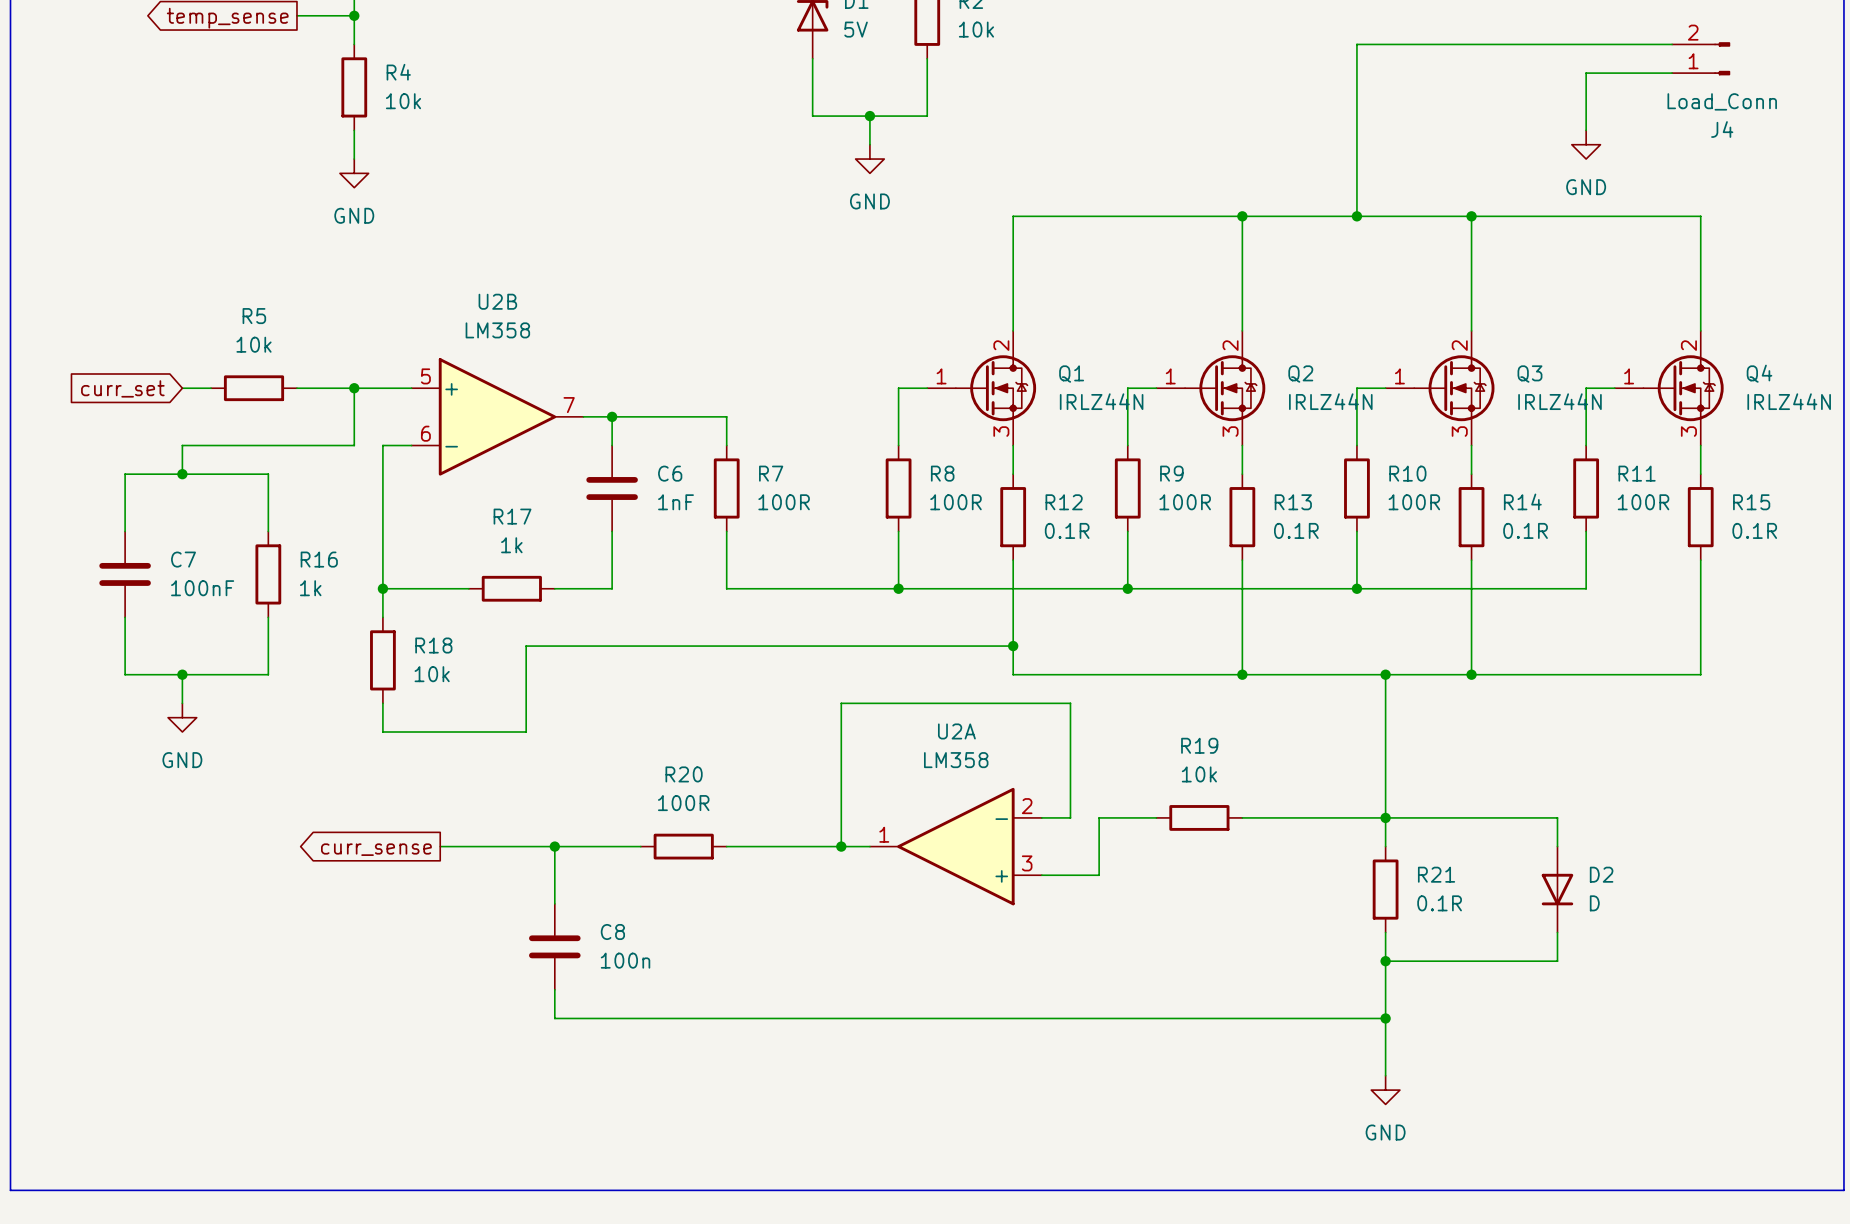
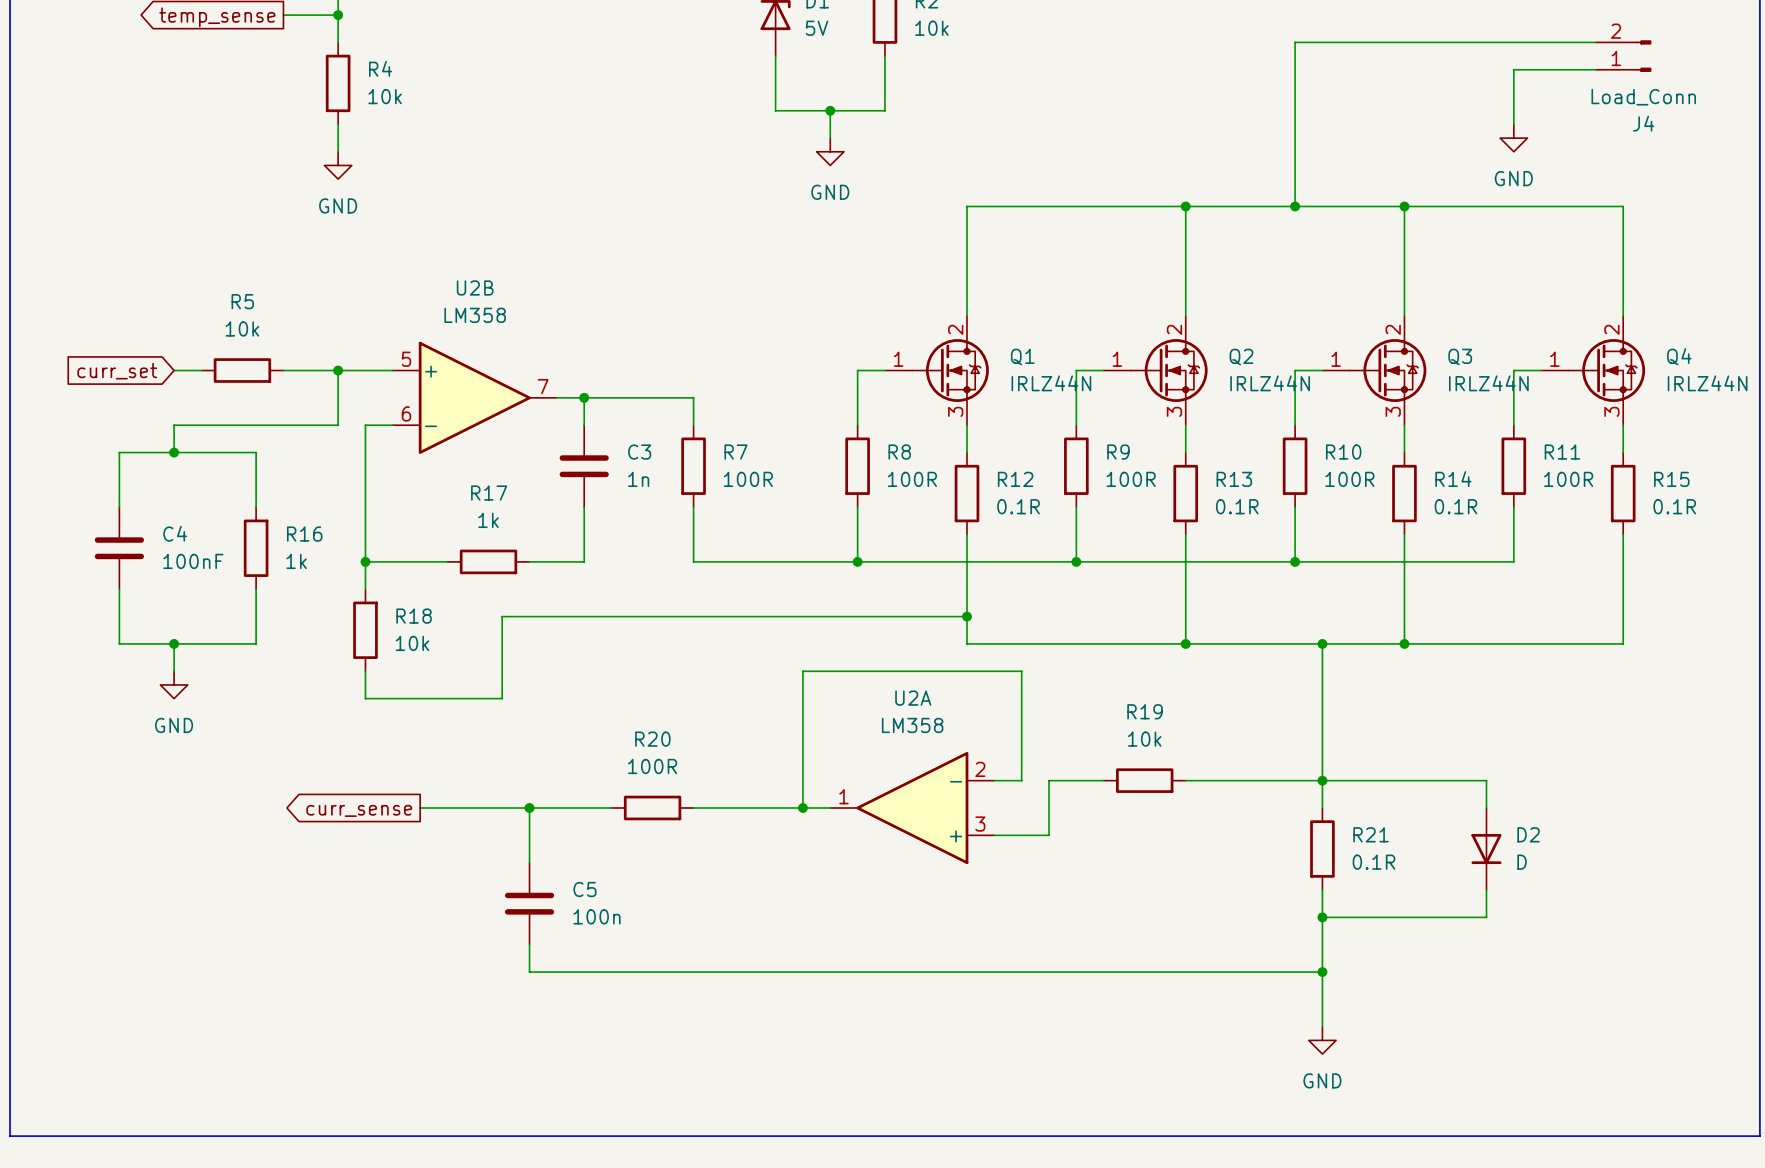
C6 name: C6 (670, 473) -> C3 (639, 452)
C6 value: 1nF (675, 502) -> 1n (638, 479)
C7 name: C7 (183, 559) -> C4 (175, 533)
C8 name: C8 (612, 932) -> C5 (584, 889)

